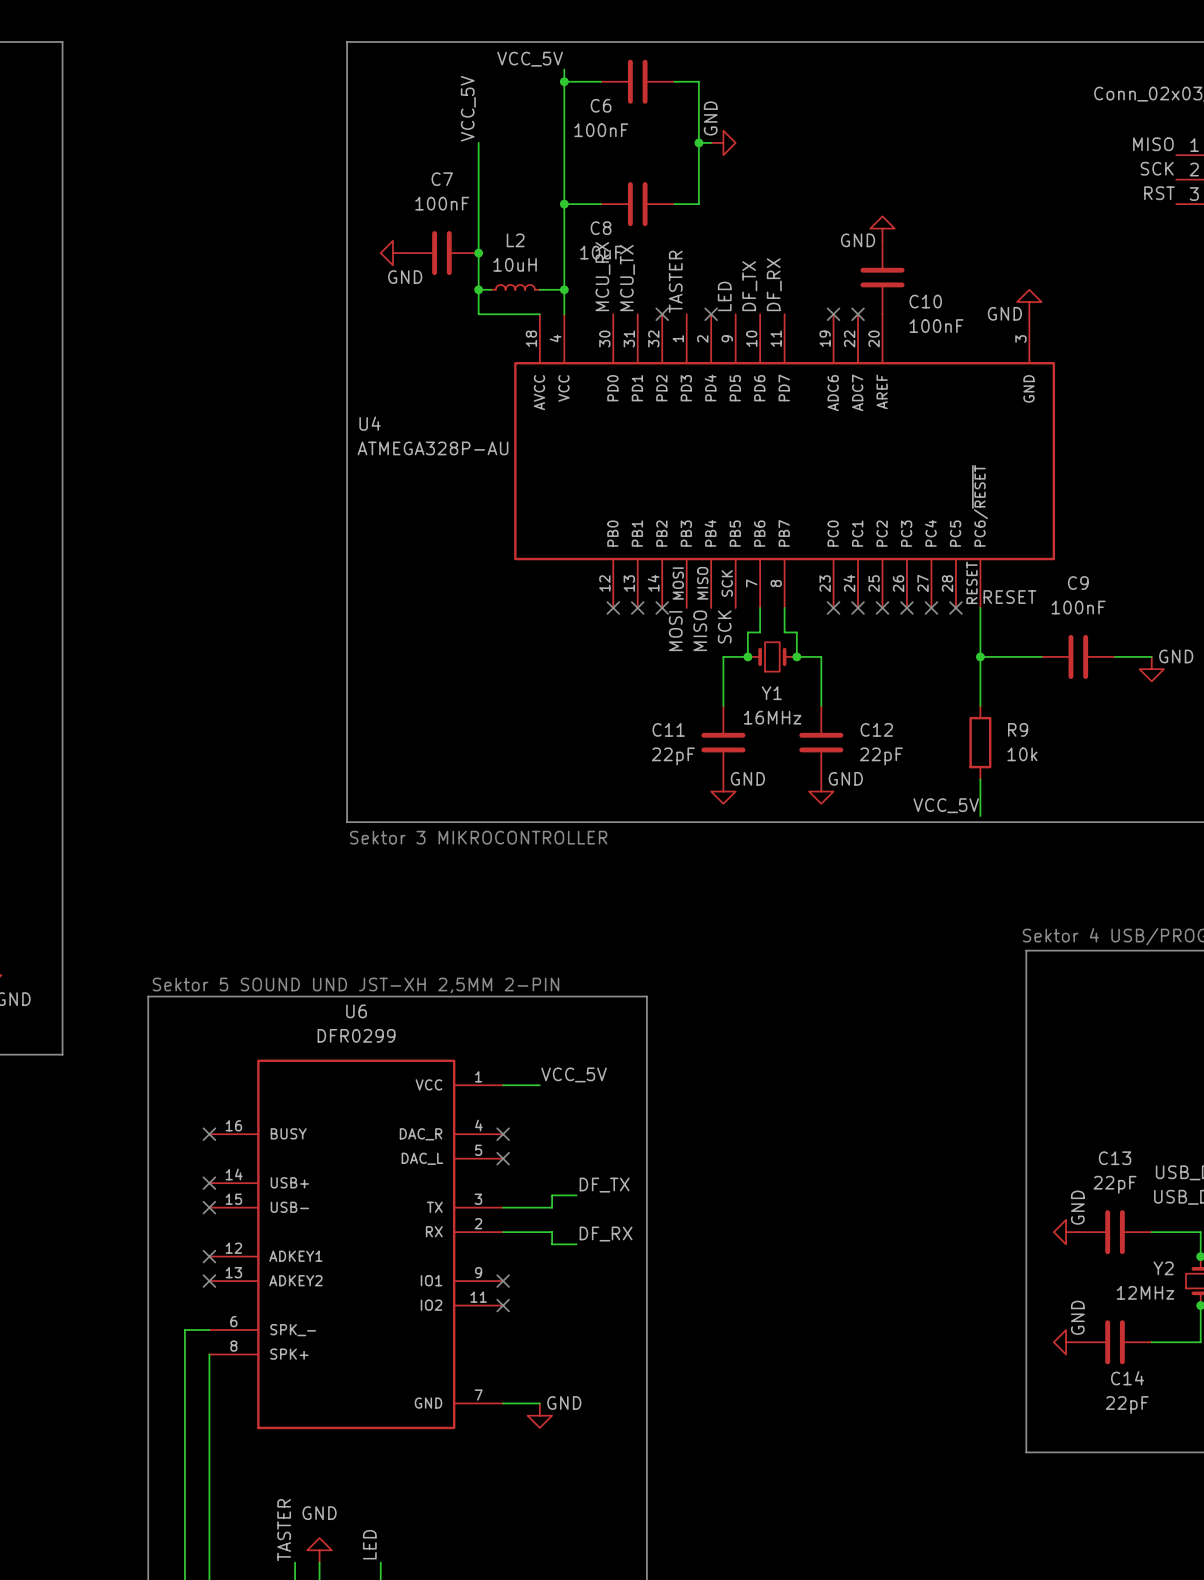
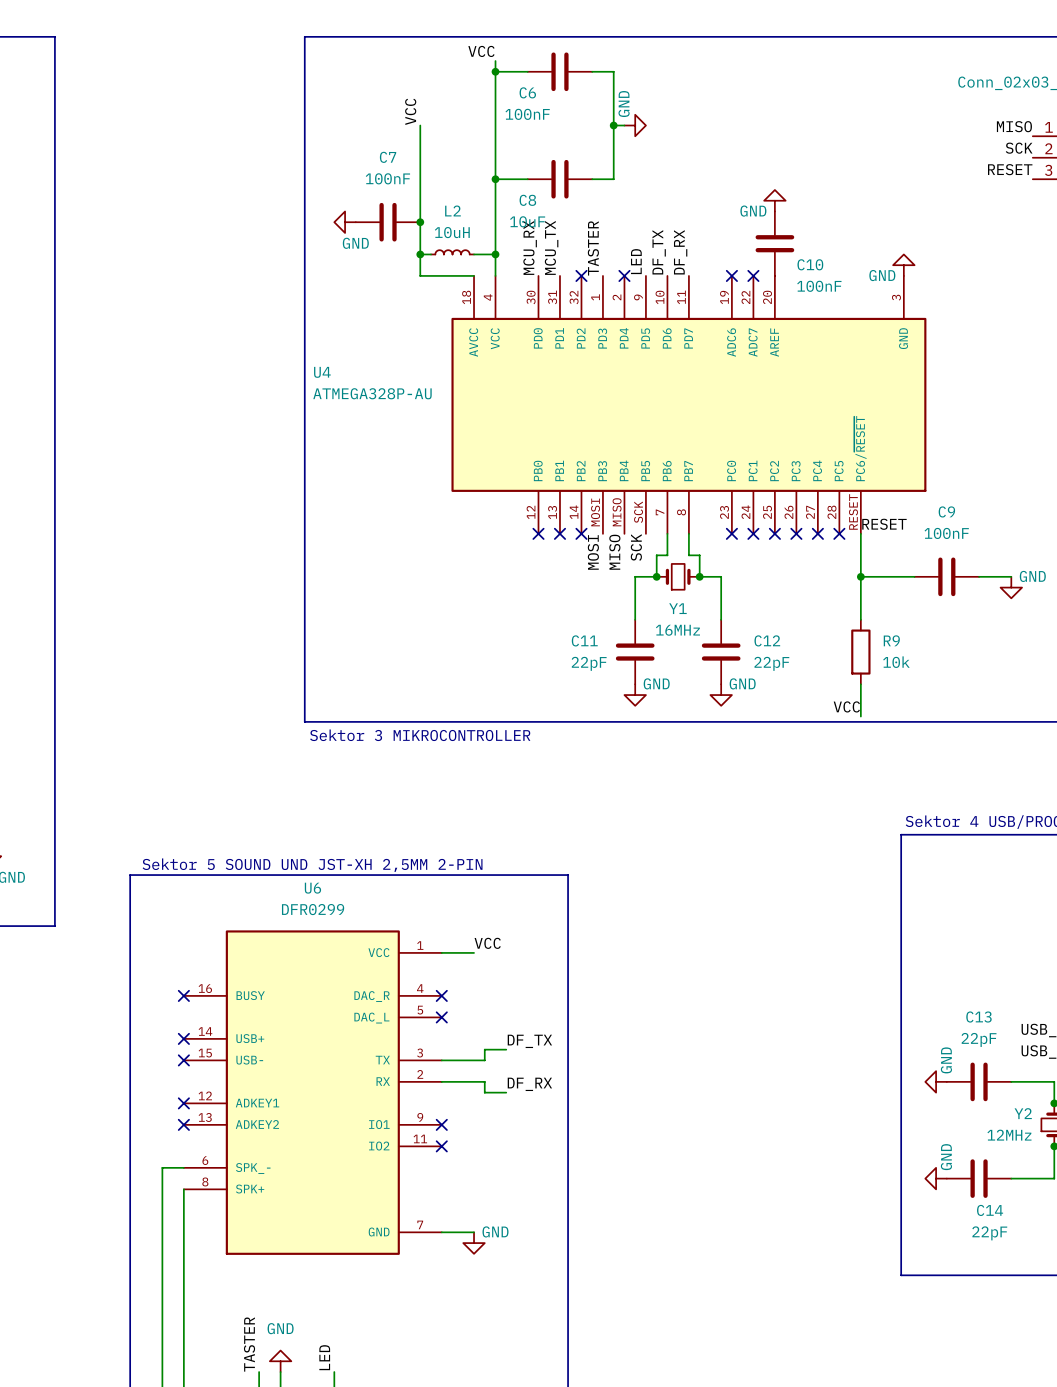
label: VCC_5V (530, 59) -> VCC (481, 51)
label: VCC_5V (468, 108) -> VCC (410, 111)
label: RST (1159, 193) -> RESET (1010, 169)
label: VCC_5V (946, 805) -> VCC (846, 706)
label: VCC_5V (574, 1074) -> VCC (487, 943)

